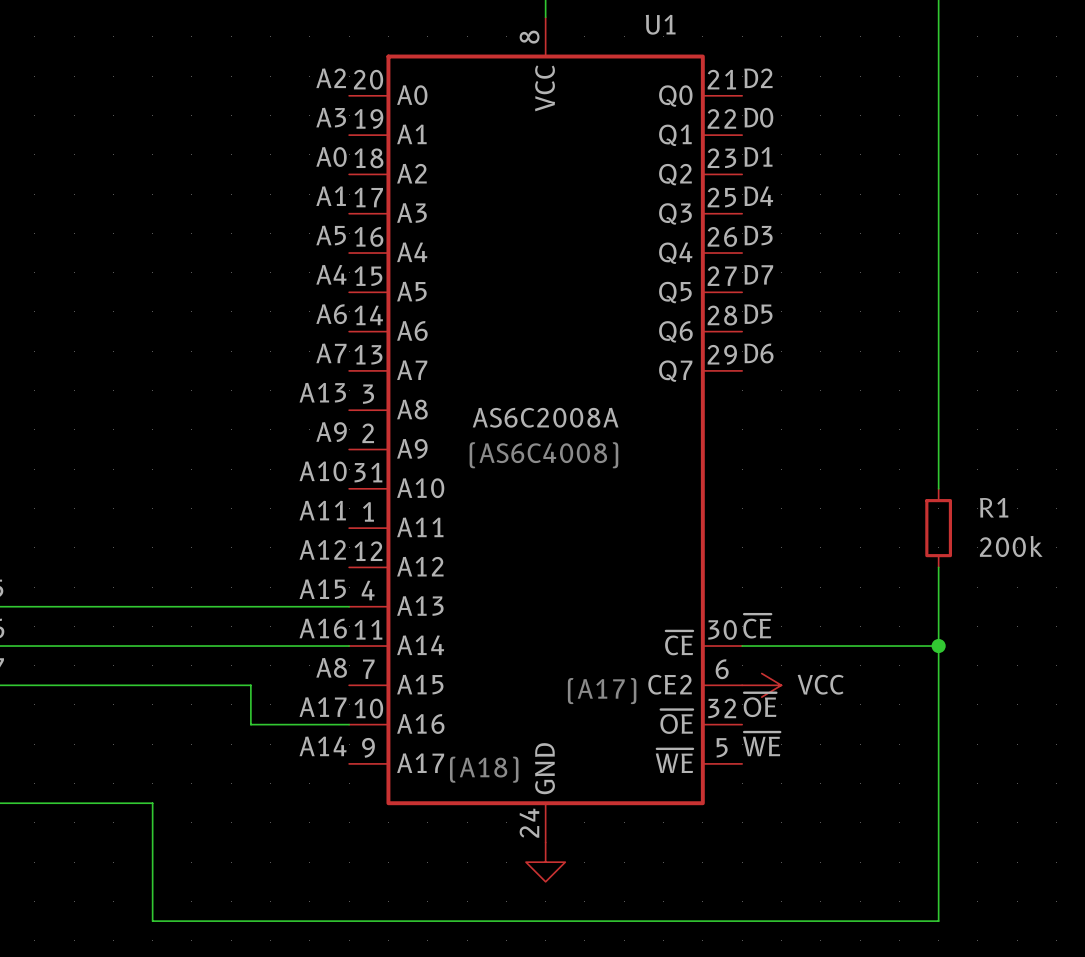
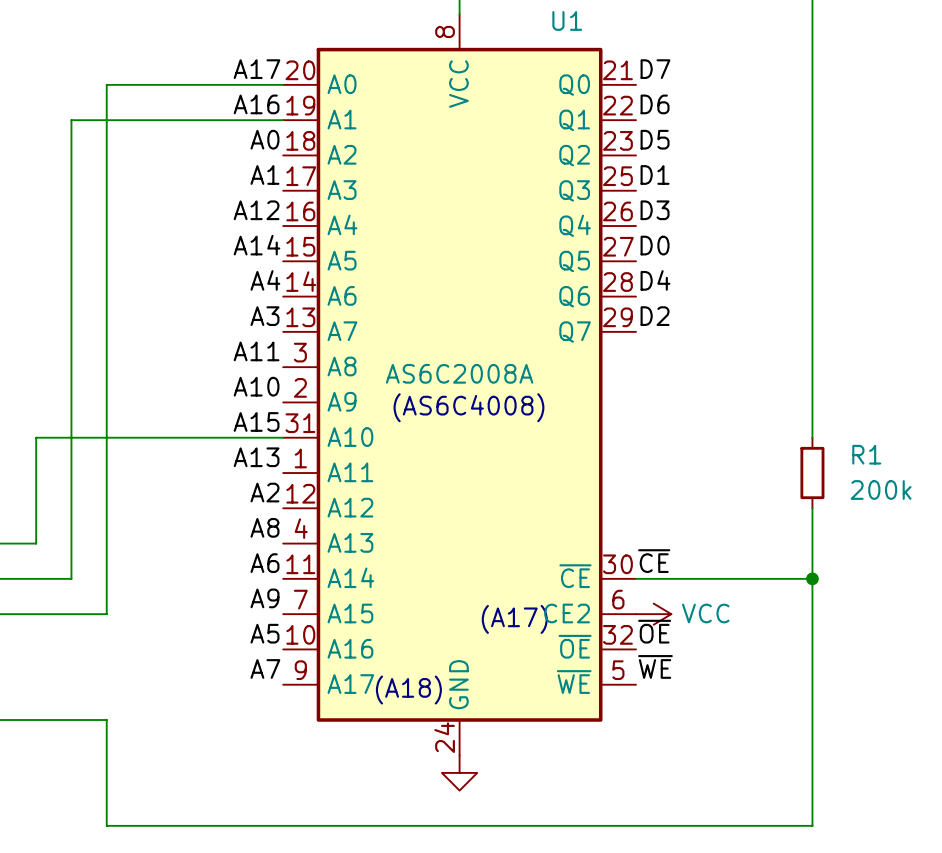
label: A2 (331, 78) -> A17 (256, 69)
label: D2 (758, 78) -> D7 (655, 69)
label: A3 (331, 117) -> A16 (256, 104)
label: D0 (758, 117) -> D6 (655, 104)
label: D1 (758, 156) -> D5 (655, 139)
label: D4 (758, 196) -> D1 (655, 174)
label: A5 (331, 235) -> A12 (256, 210)
label: A4 (331, 274) -> A14 (256, 245)
label: D7 (758, 274) -> D0 (655, 245)
label: A6 (331, 314) -> A4 (265, 280)
label: D5 (758, 314) -> D4 (655, 280)
label: A7 (331, 353) -> A3 (264, 316)
label: D6 (758, 353) -> D2 (655, 316)
label: A13 (322, 392) -> A11 (256, 351)
label: A9 (331, 432) -> A10 (256, 386)
label: A10 (323, 471) -> A15 (256, 421)
label: A11 (322, 510) -> A13 (256, 457)
label: A12 (322, 549) -> A2 (264, 492)
label: A15 (322, 589) -> A8 (264, 527)
wire: (74, 606) (349, 606) -> (36, 543) (36, 437) (283, 437)
label: A16 (323, 628) -> A6 (264, 563)
wire: (113, 646) (349, 646) -> (71, 578) (71, 120) (283, 120)
label: A8 (331, 667) -> A9 (264, 598)
wire: (152, 685) (250, 685) (250, 724) (349, 724) -> (106, 614) (106, 84) (283, 84)
label: A17 (323, 707) -> A5 (264, 633)
label: A14 (323, 746) -> A7 (265, 668)

